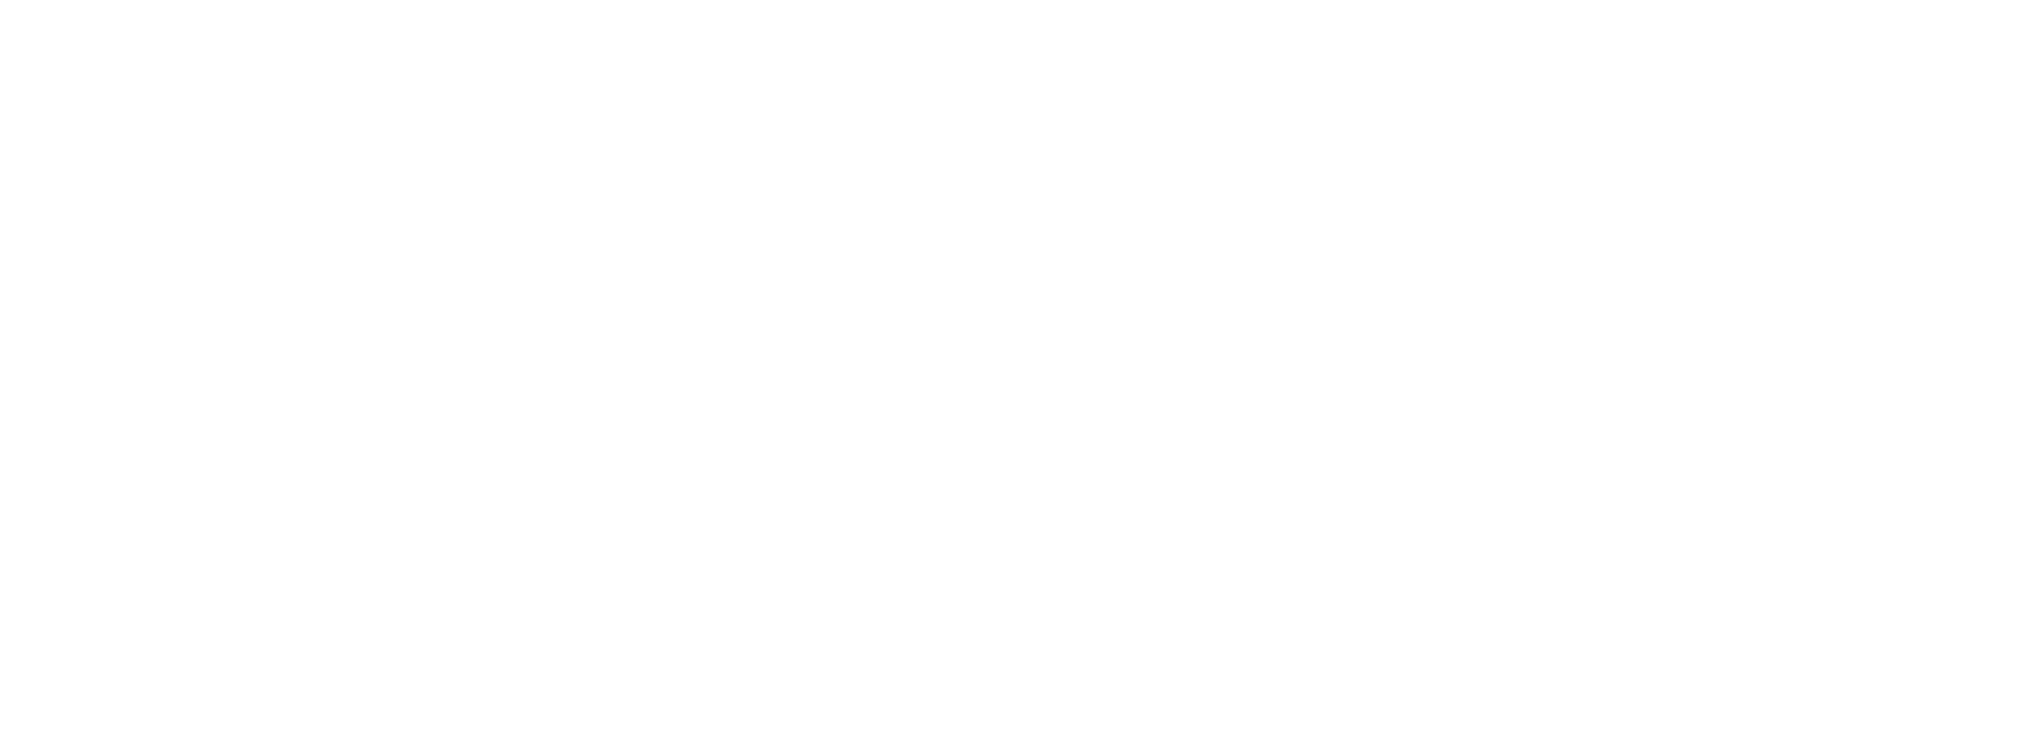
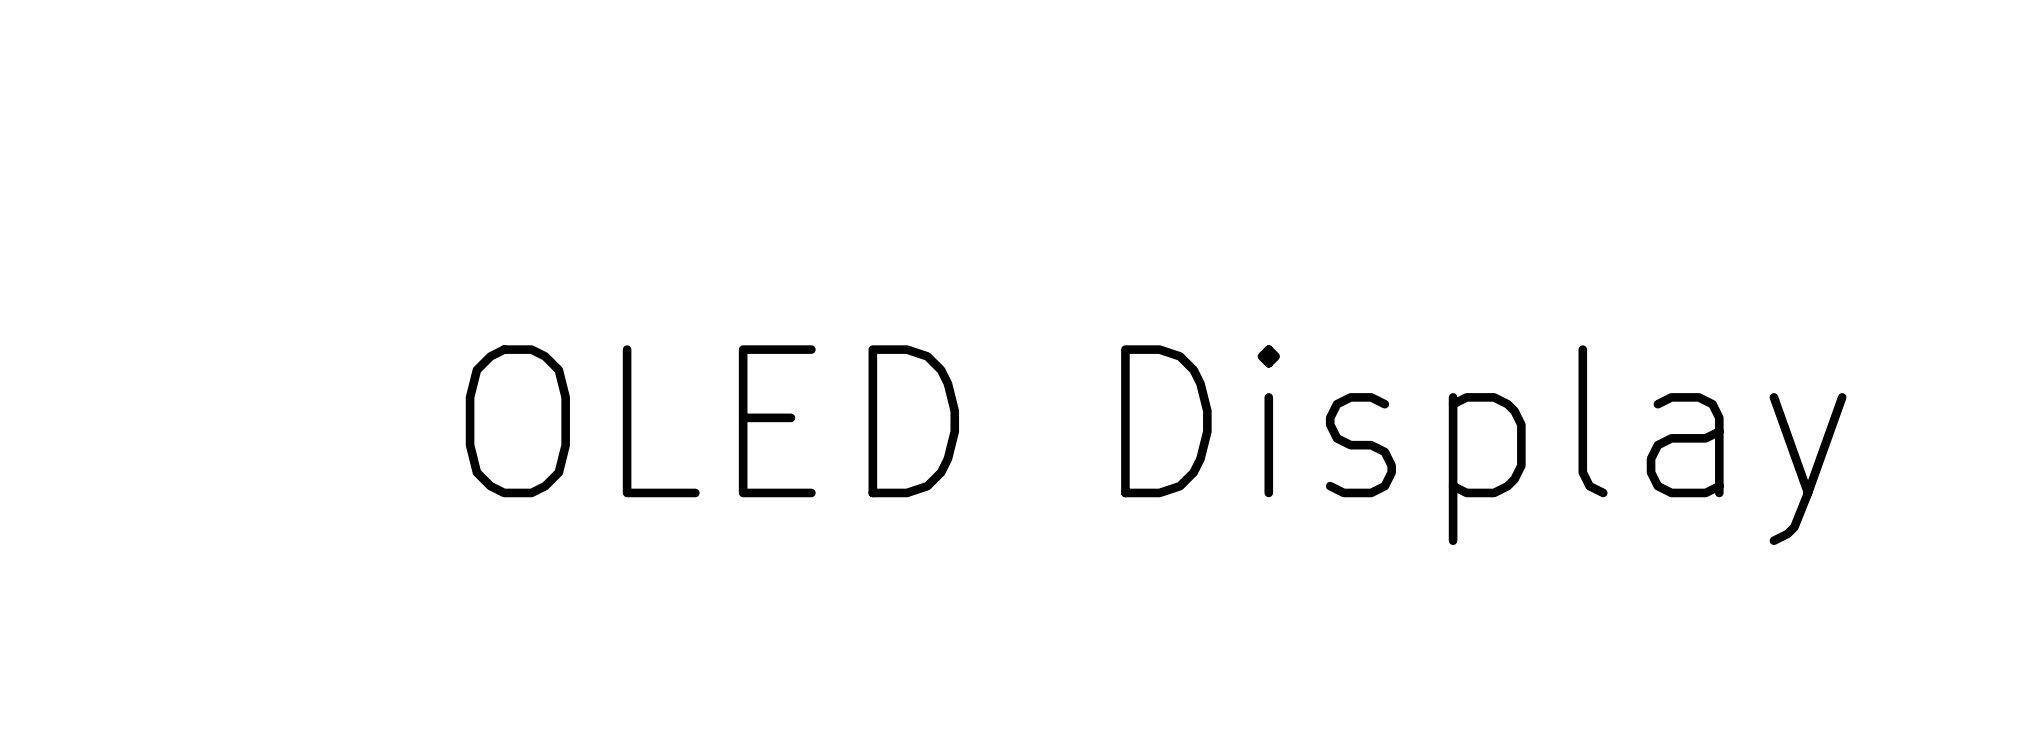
text: none -> OLED Display (1156, 445)

